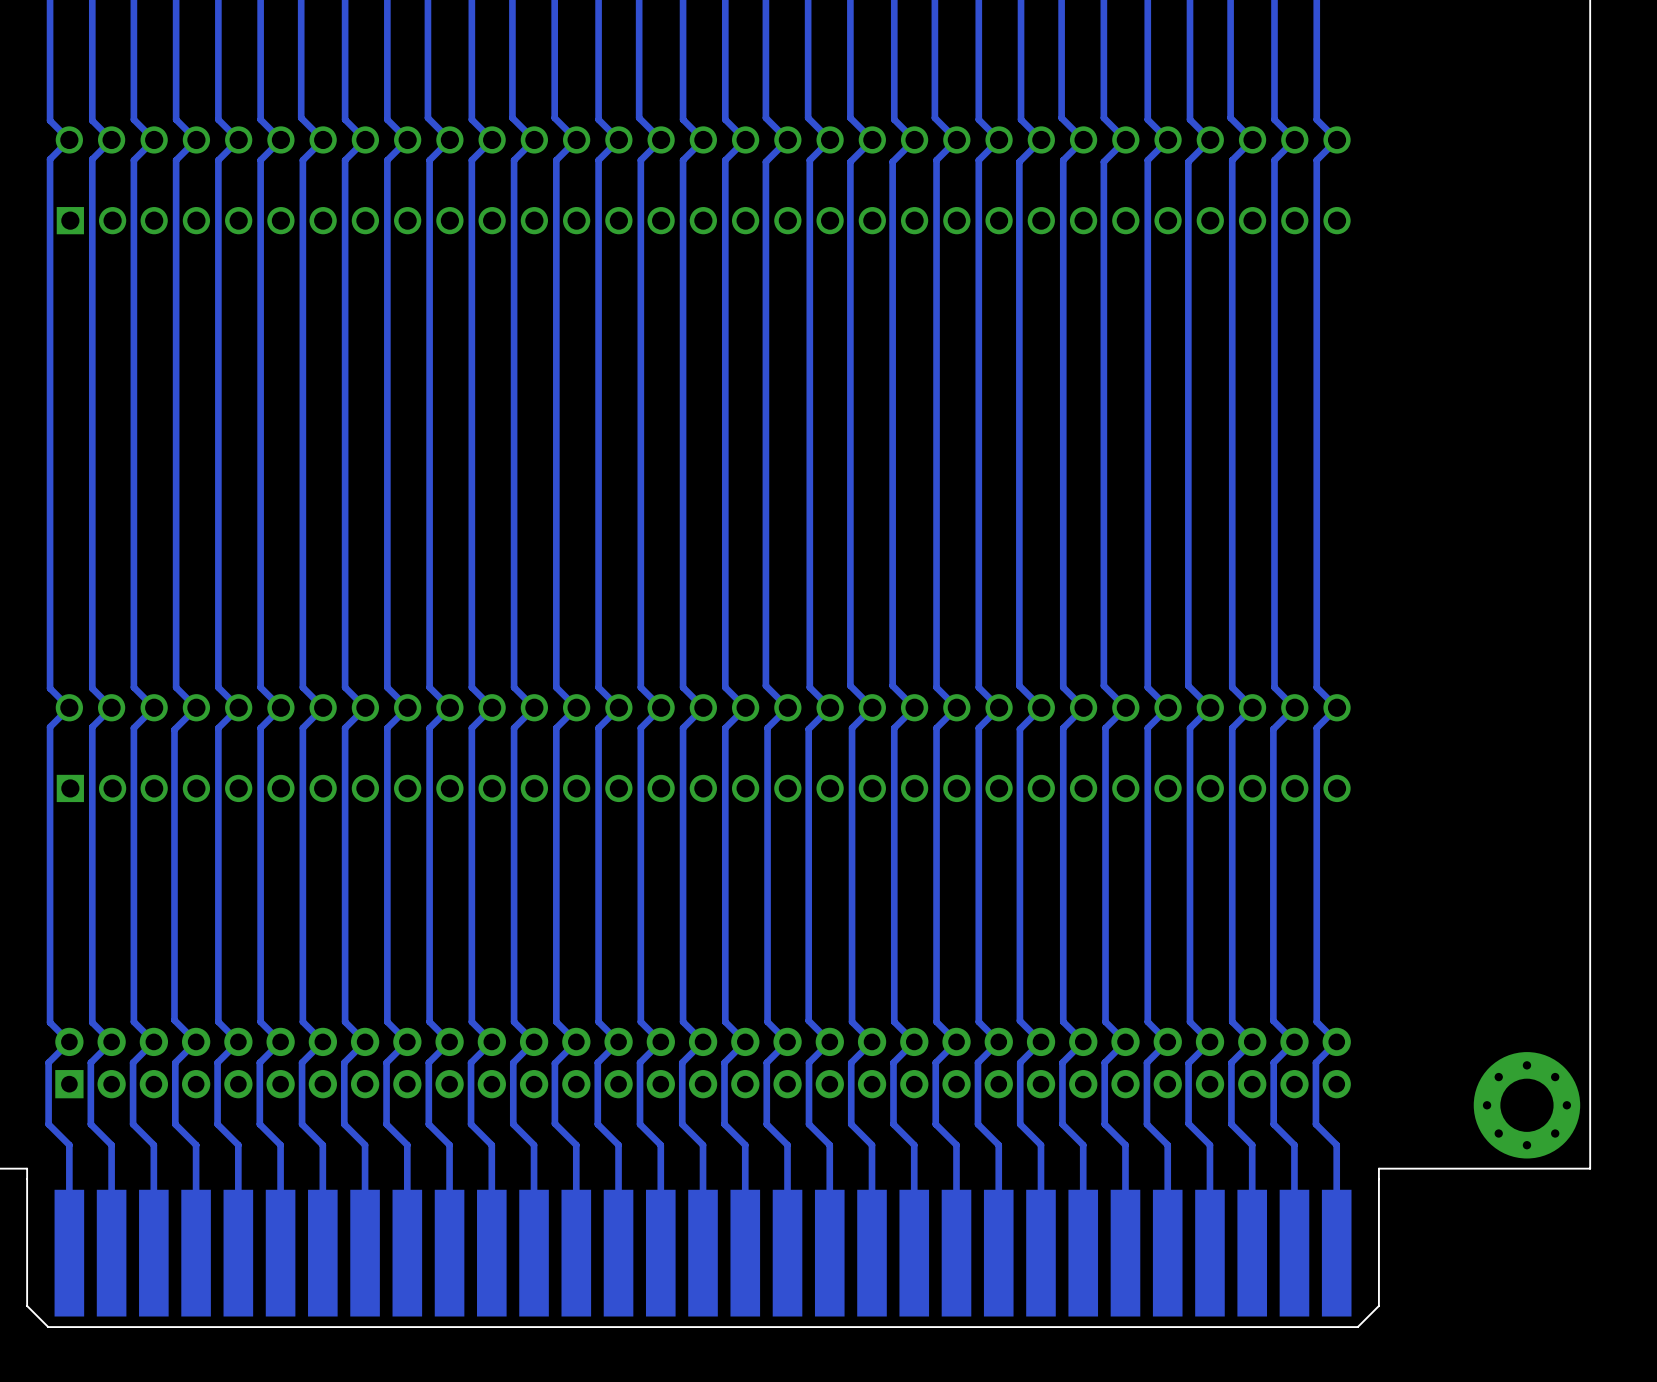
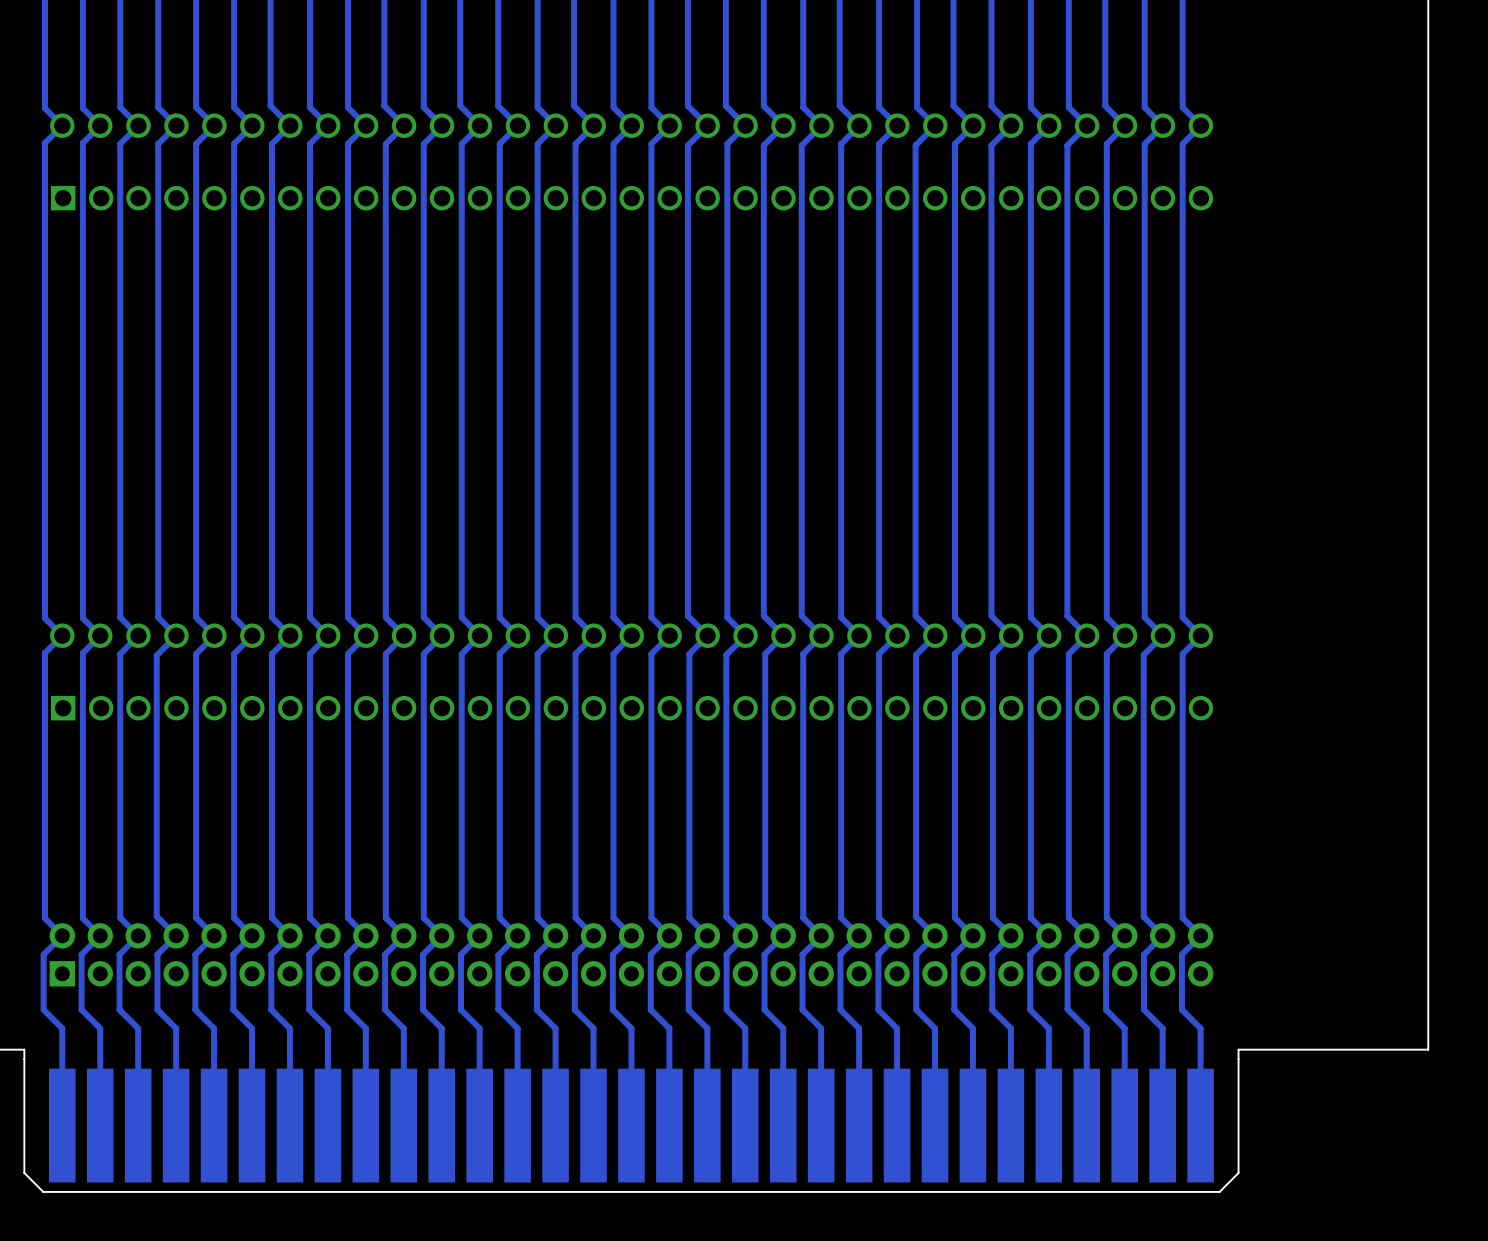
part: (1526, 1105) -> none

